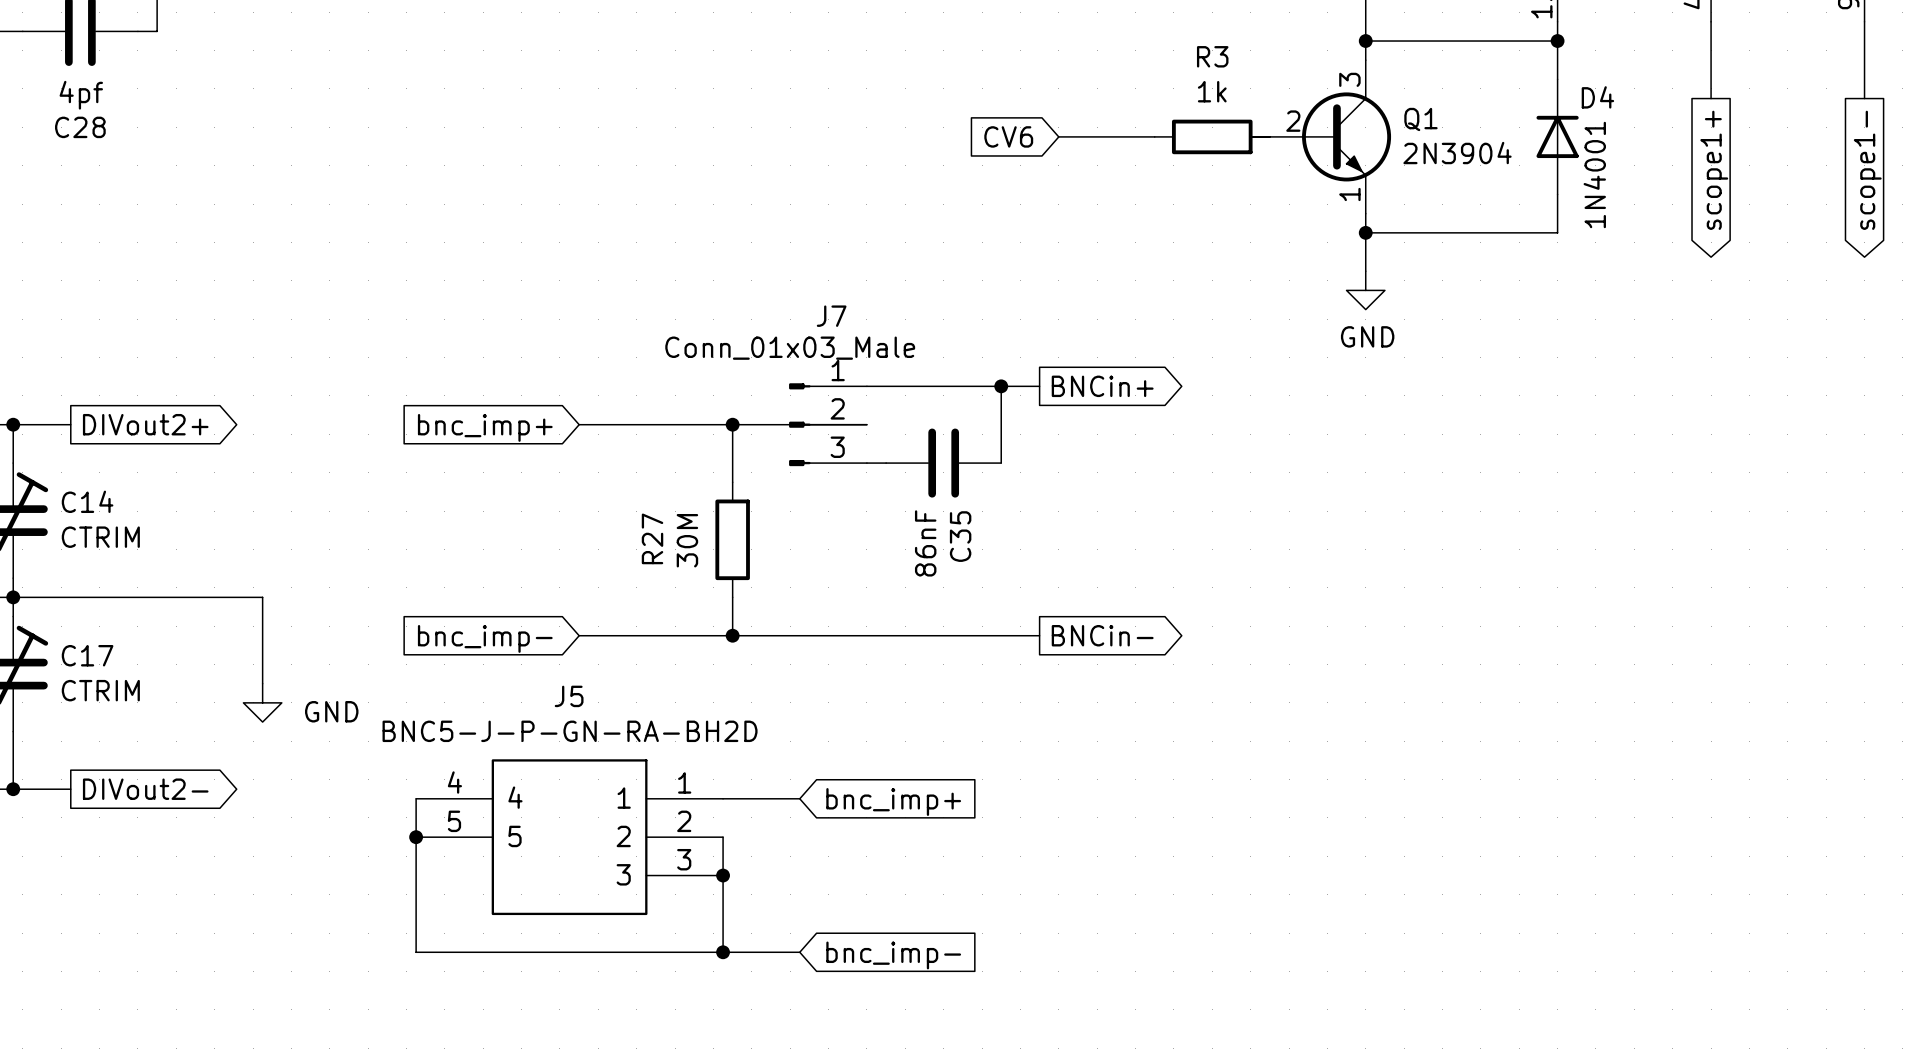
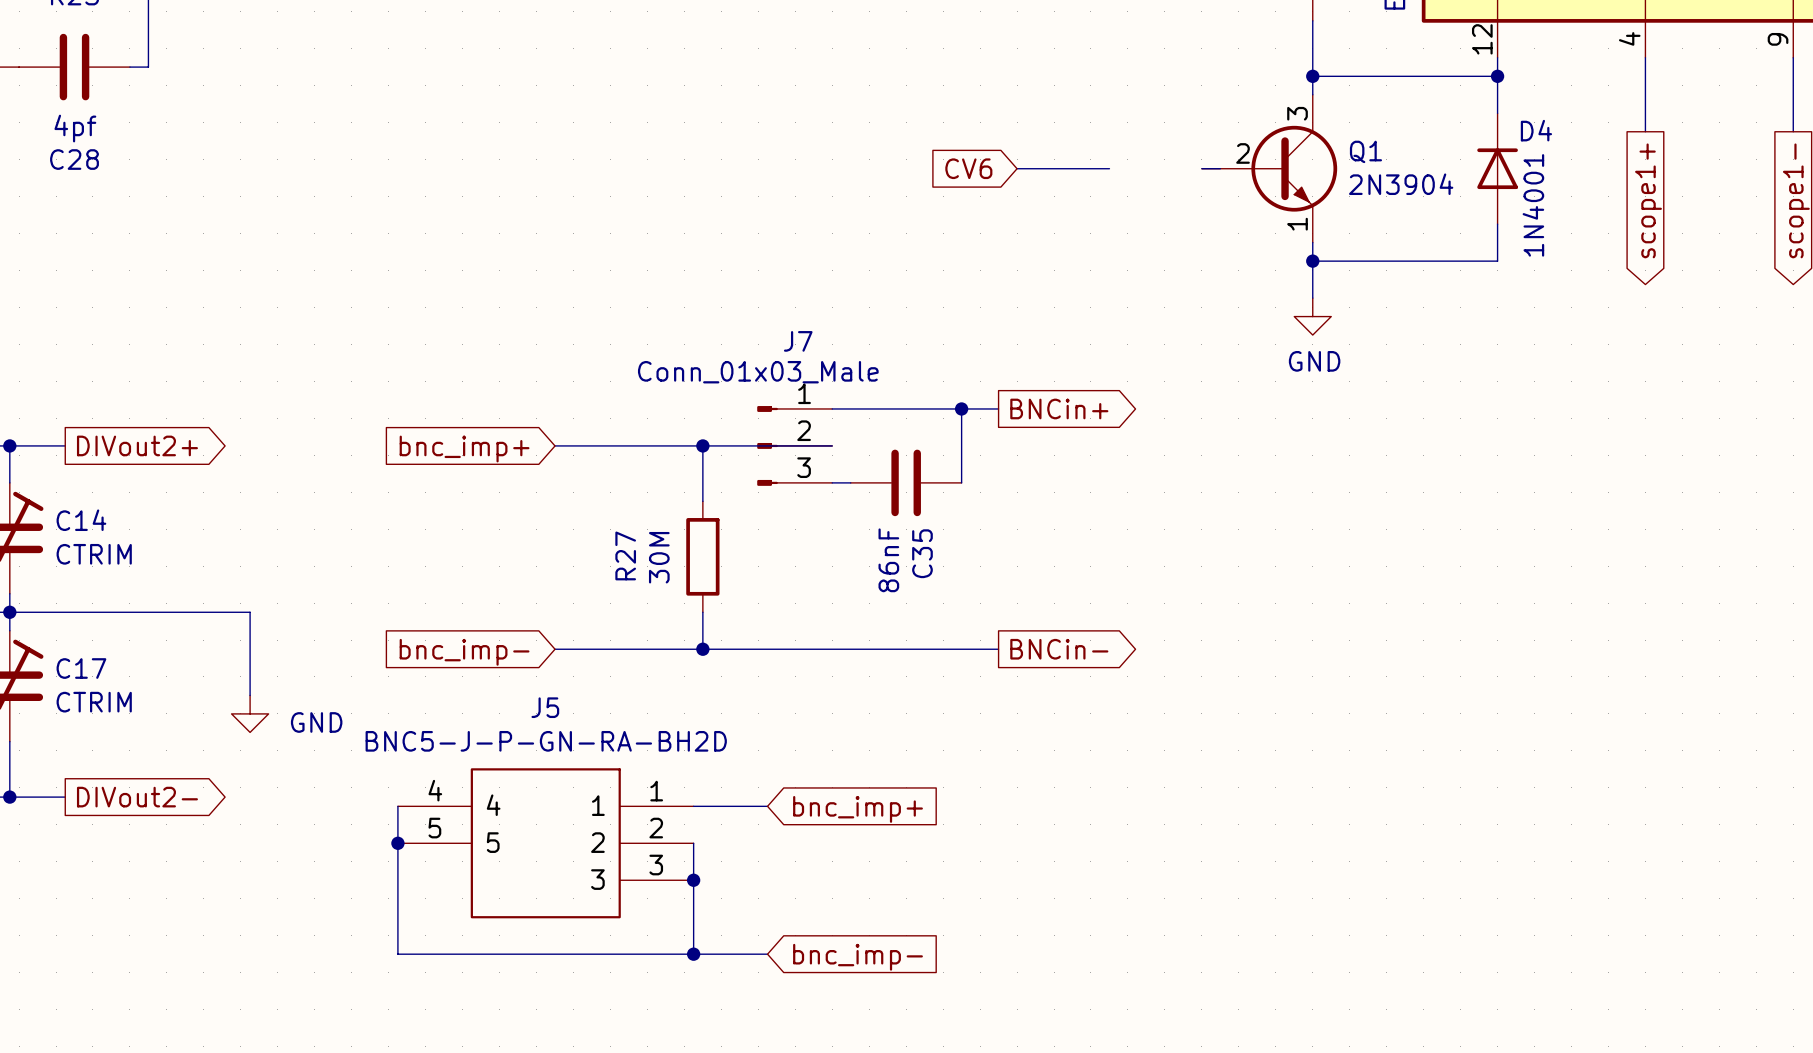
R3: 1k (1212, 136) -> none

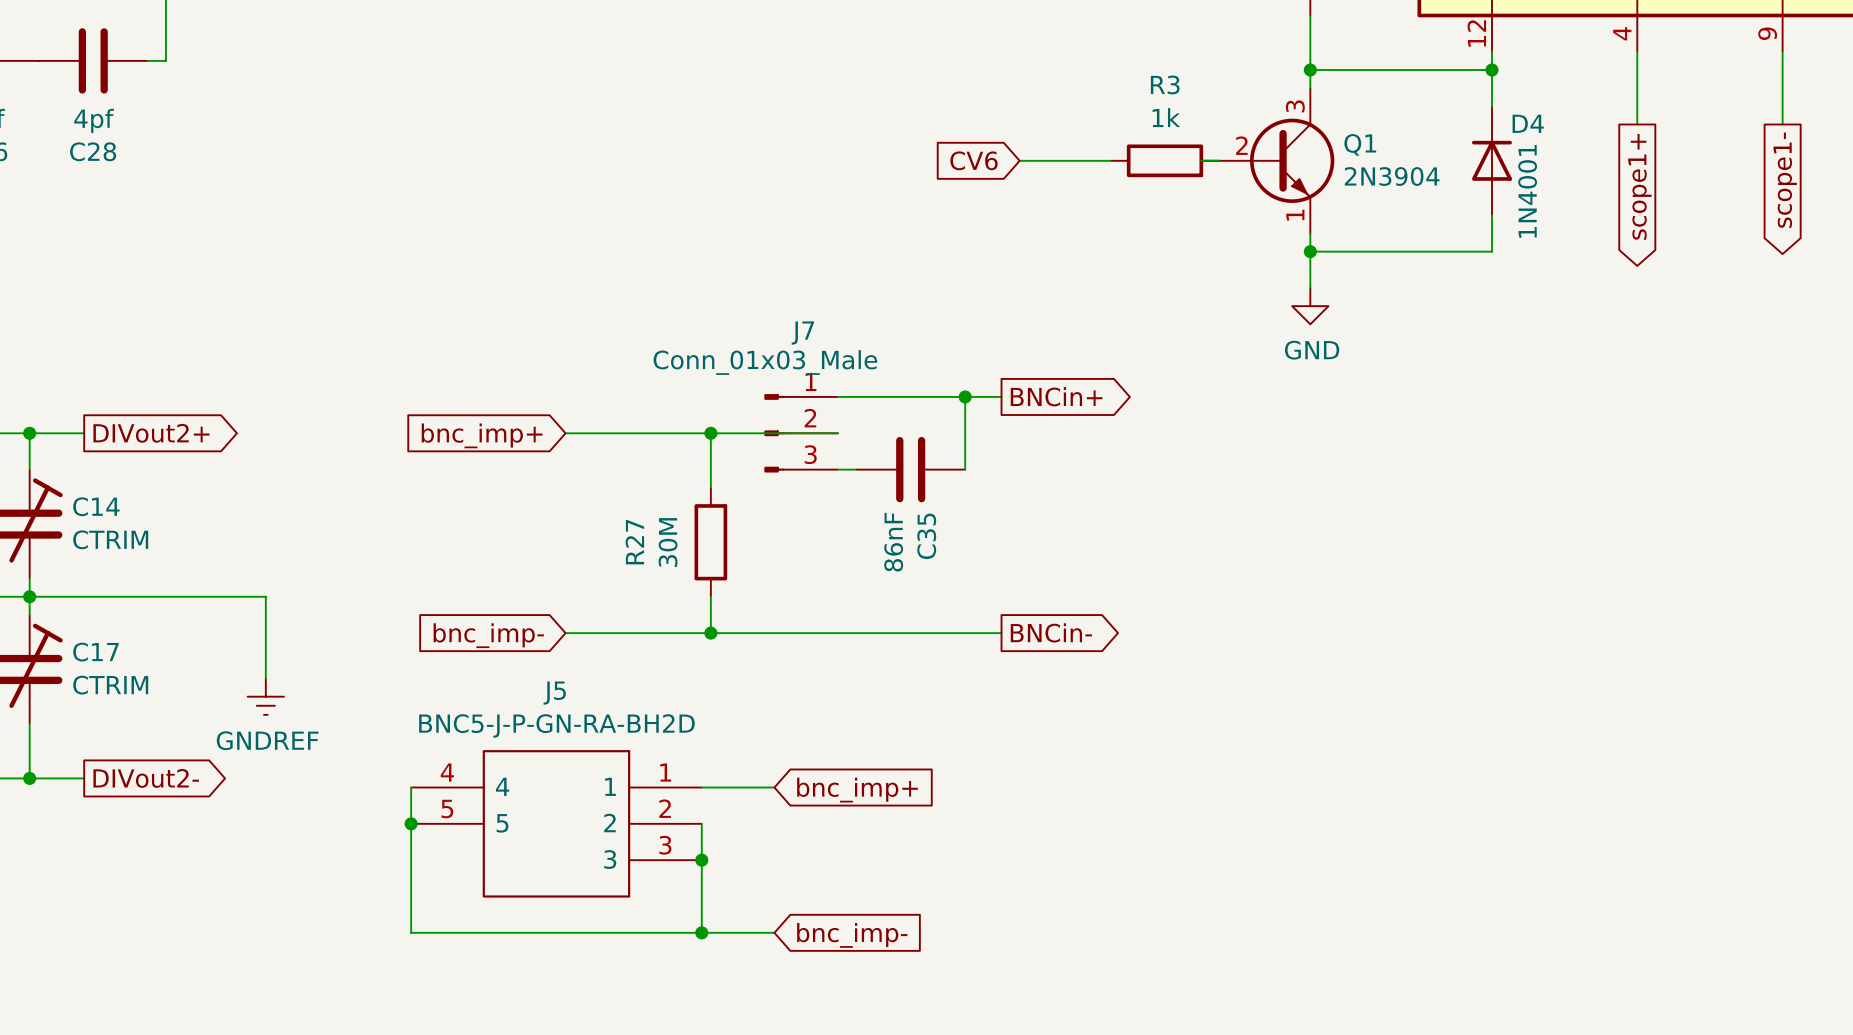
R3: none -> 1k (1165, 160)
power symbol: GND (250, 713) -> GNDREF (265, 696)

